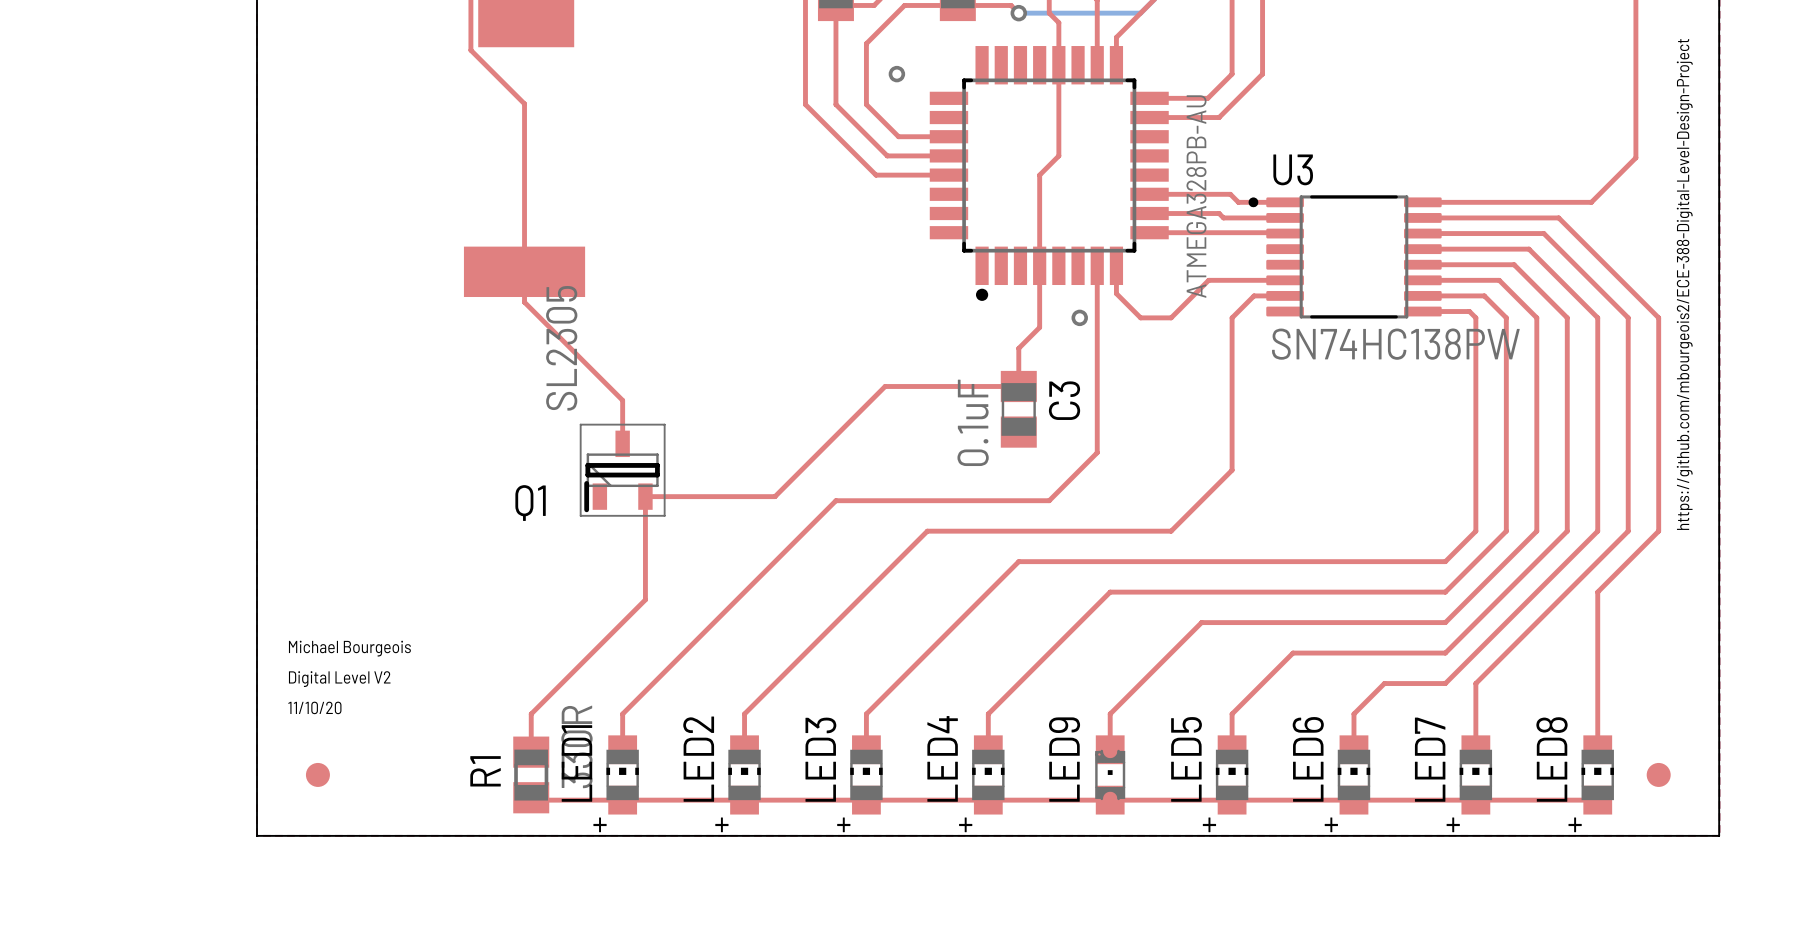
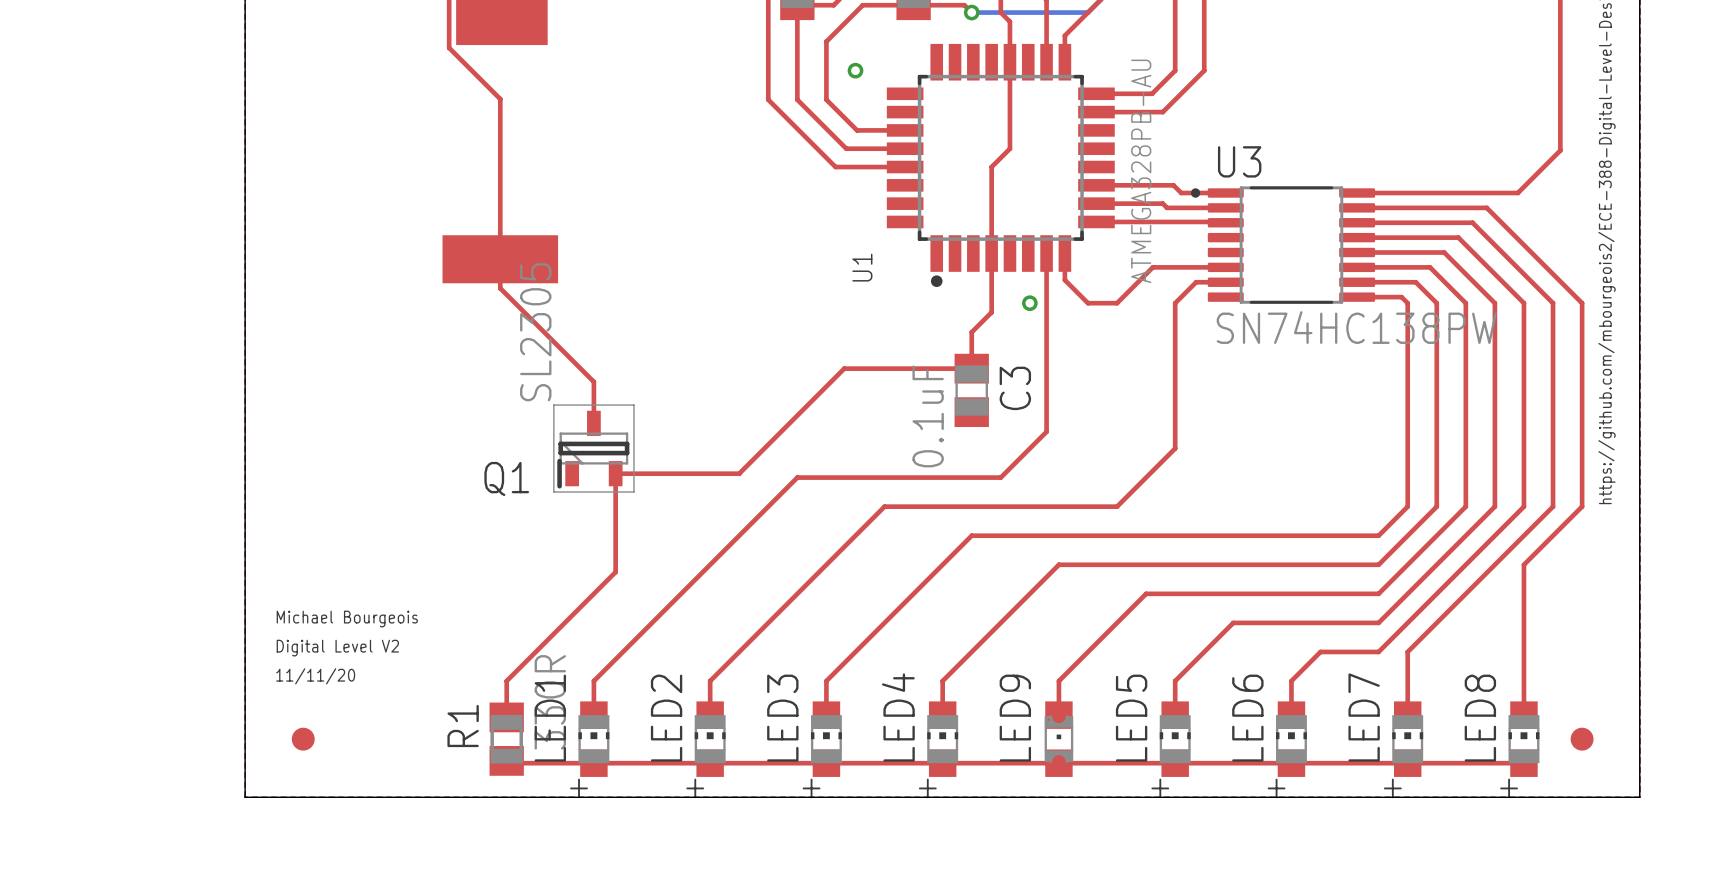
U1 name: none -> U1 (862, 267)
text: 11/10/20 (314, 707) -> 11/11/20 (315, 676)

